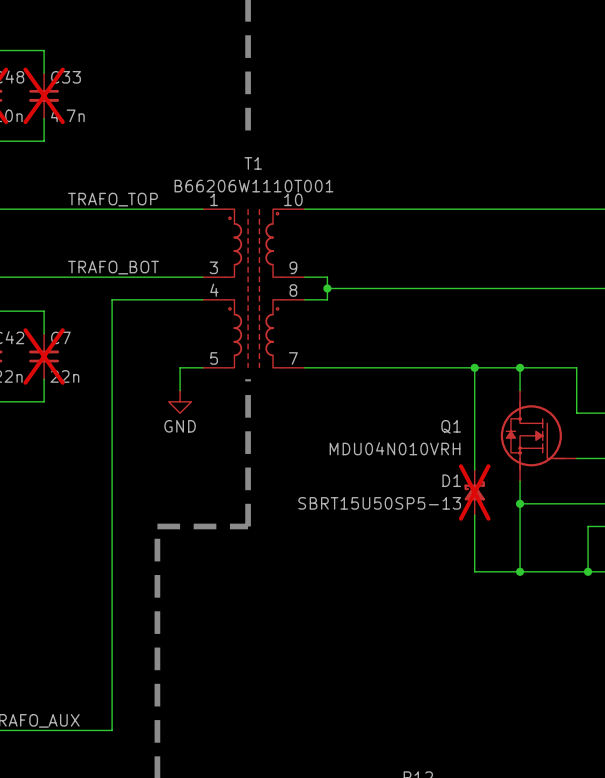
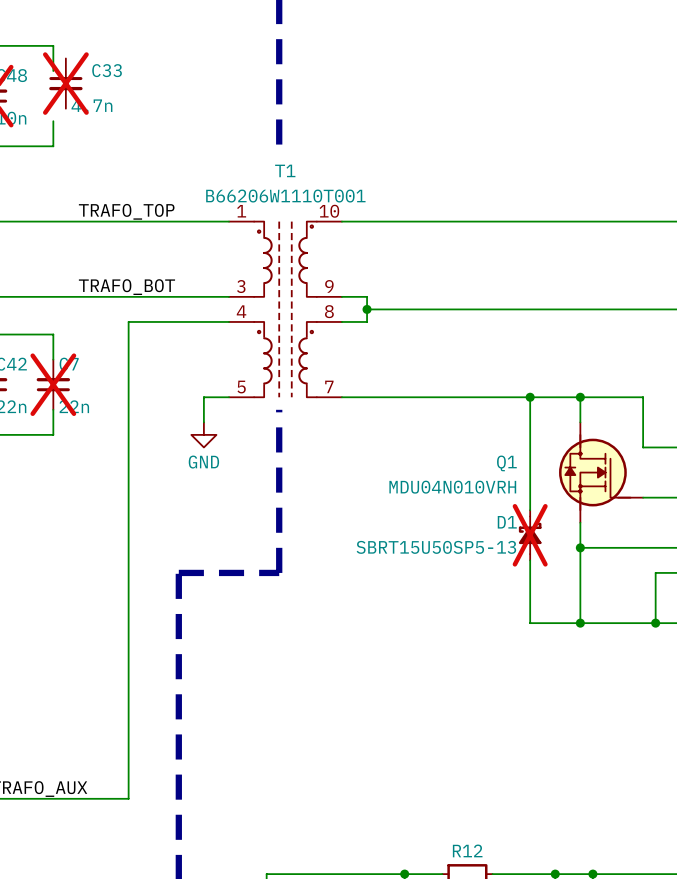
C33 name position: C33 (65, 77) -> C33 (107, 70)
C33 position: (44, 95) -> (65, 83)

